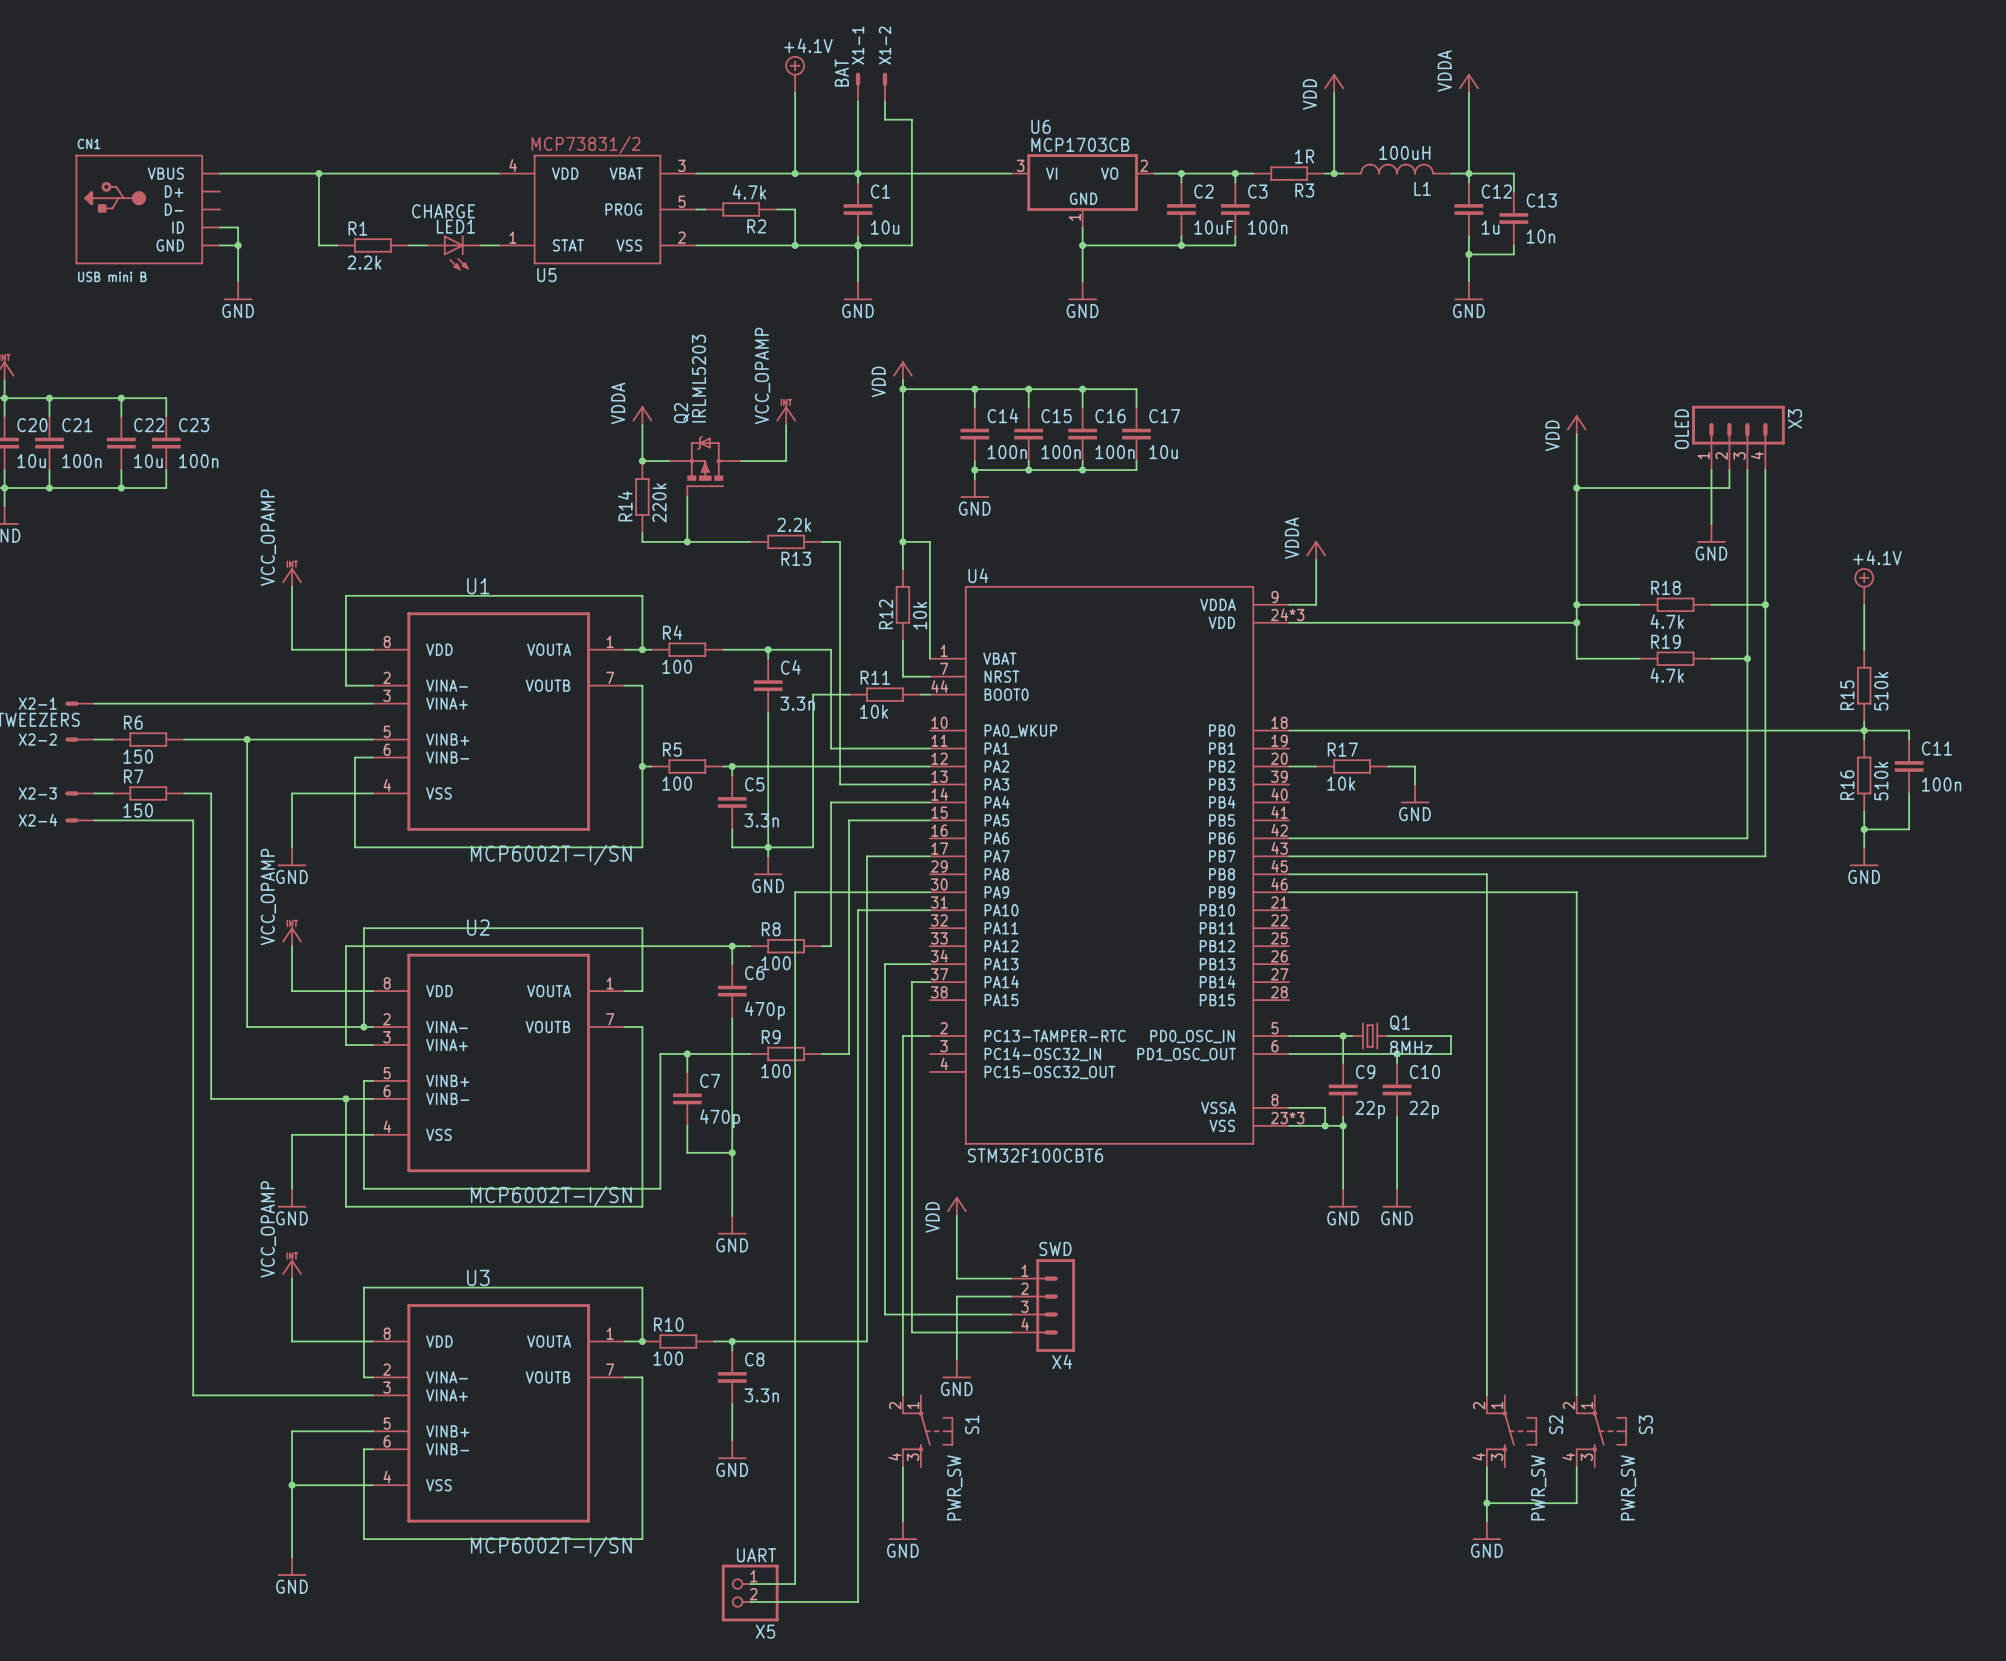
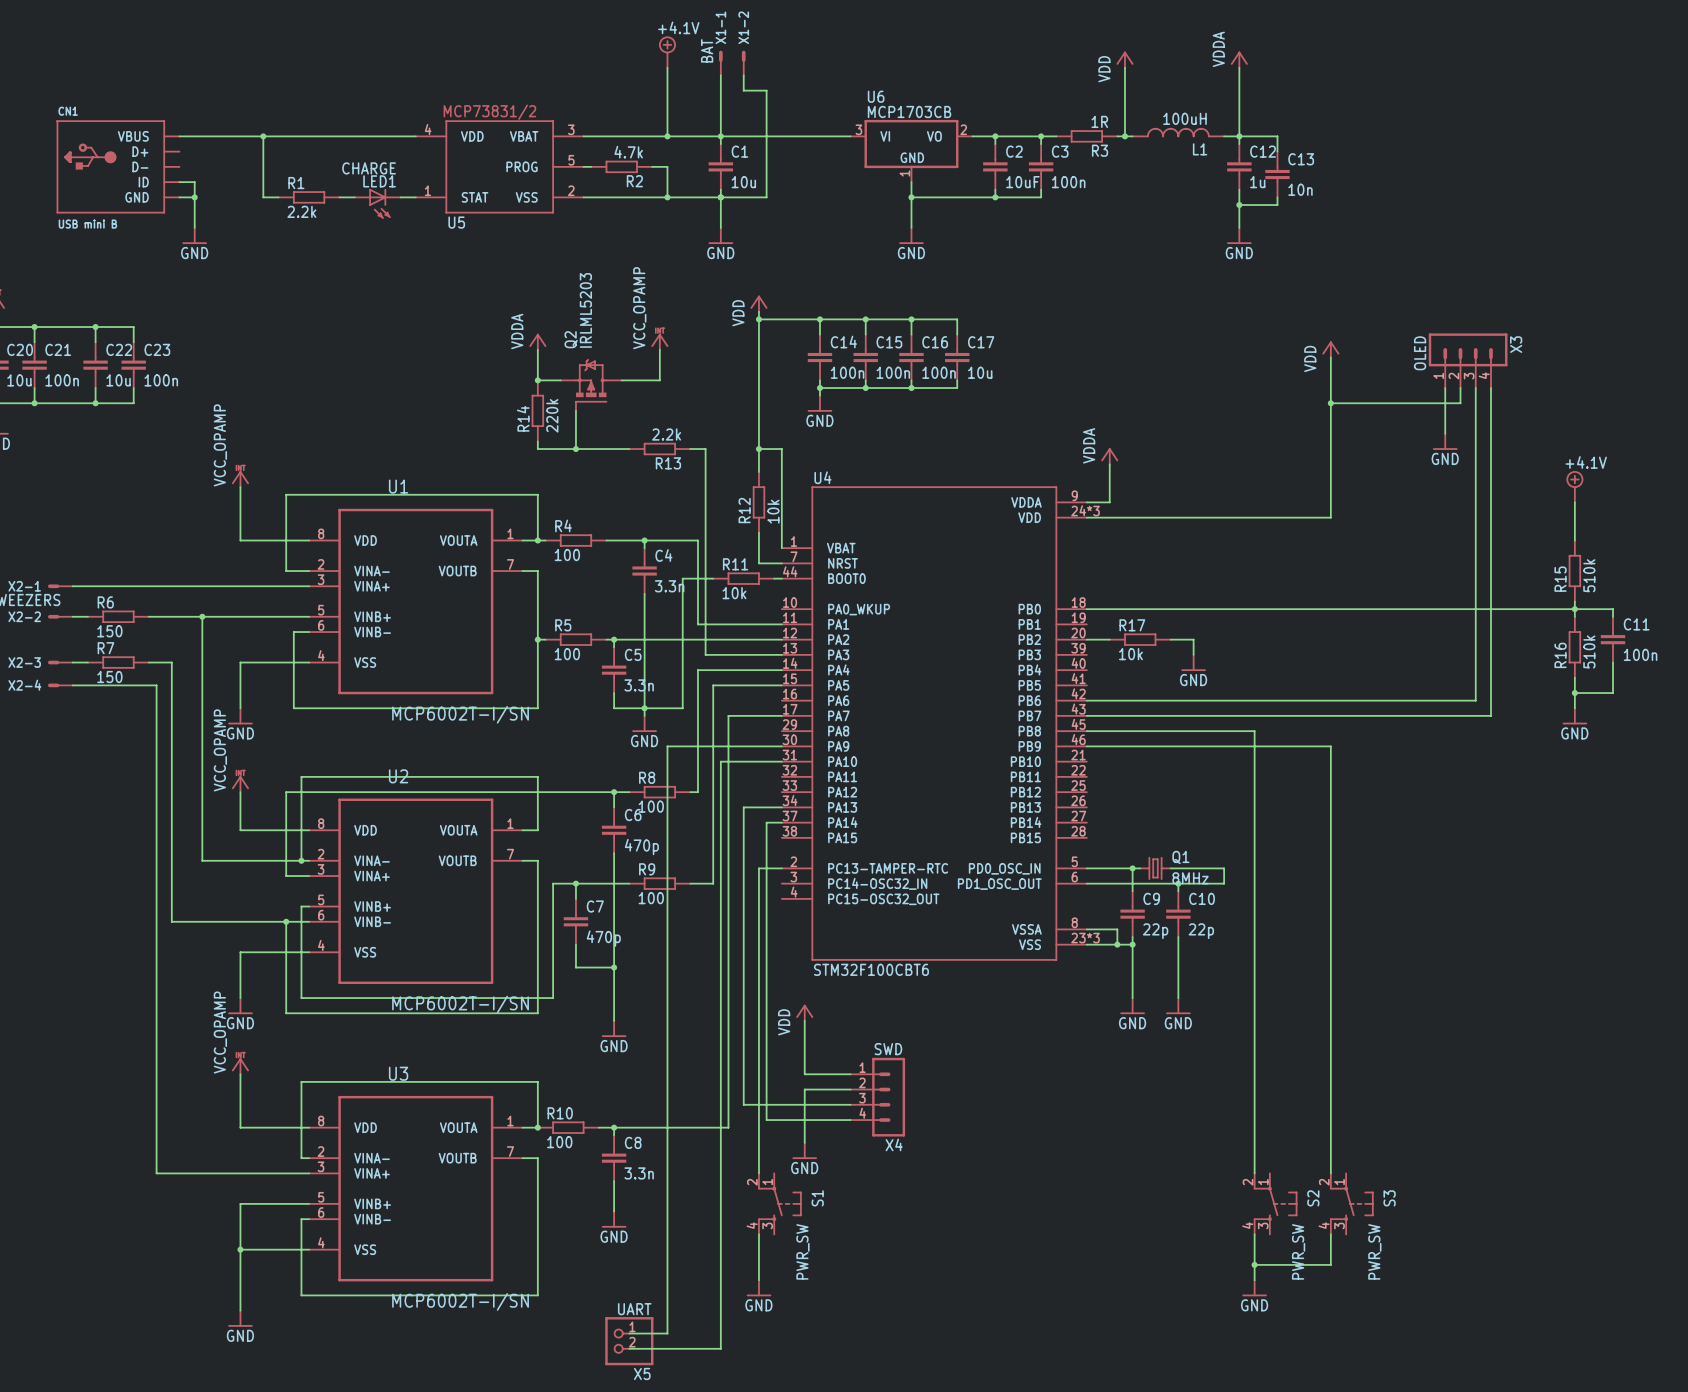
wire: (1576, 604) (1639, 604) -> none
junction: (1576, 604) -> none
R18: 4.7k (1675, 604) -> none
wire: (1711, 604) (1765, 604) -> none
junction: (1765, 604) -> none
wire: (1576, 622) (1576, 658) (1639, 658) -> none
junction: (1576, 622) -> none
R19: 4.7k (1675, 658) -> none
wire: (1711, 658) (1747, 658) -> none
junction: (1747, 658) -> none

